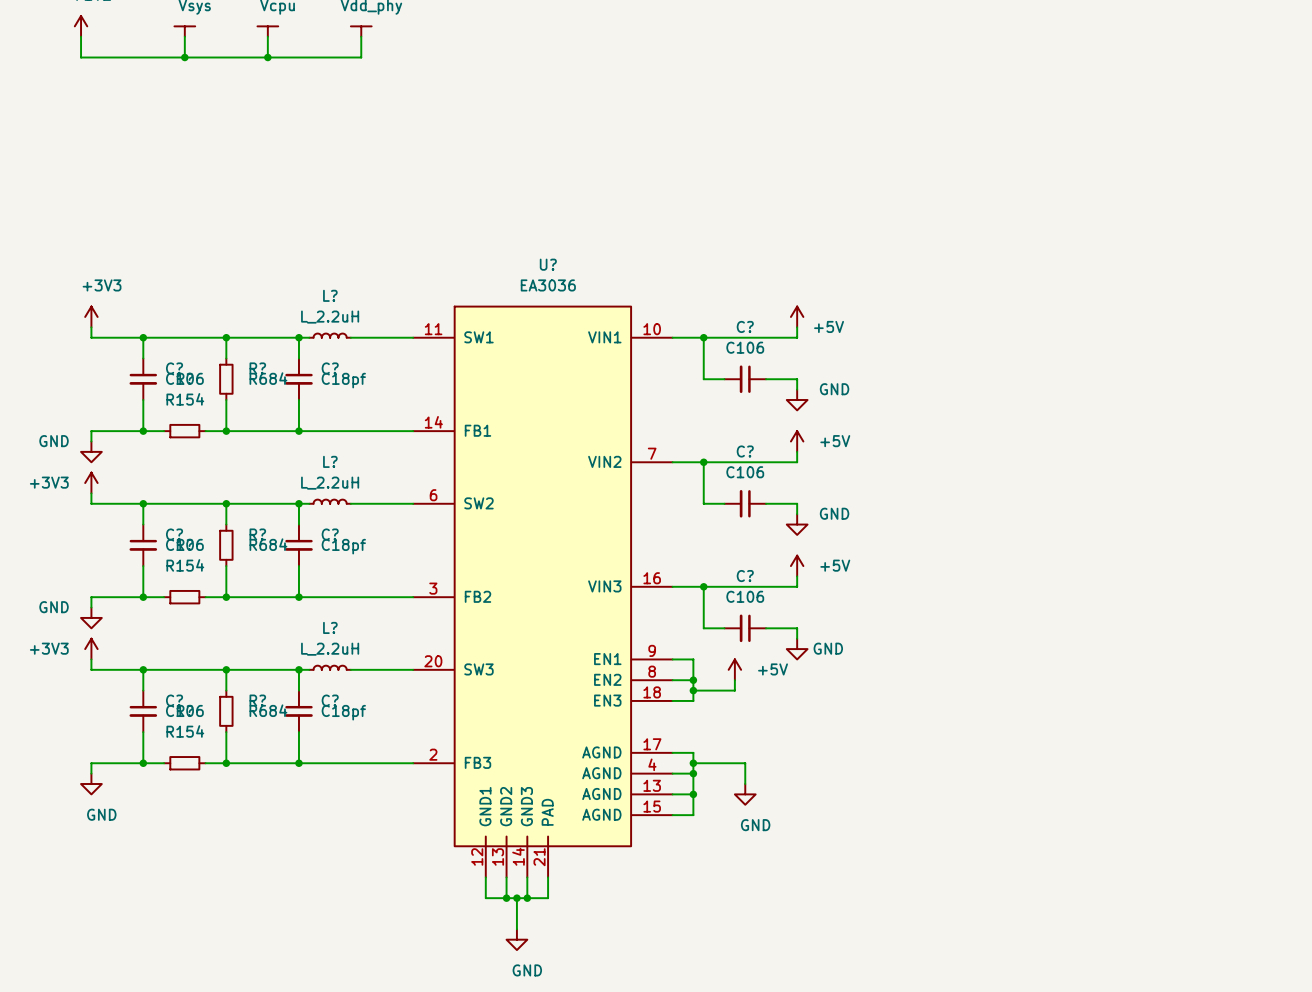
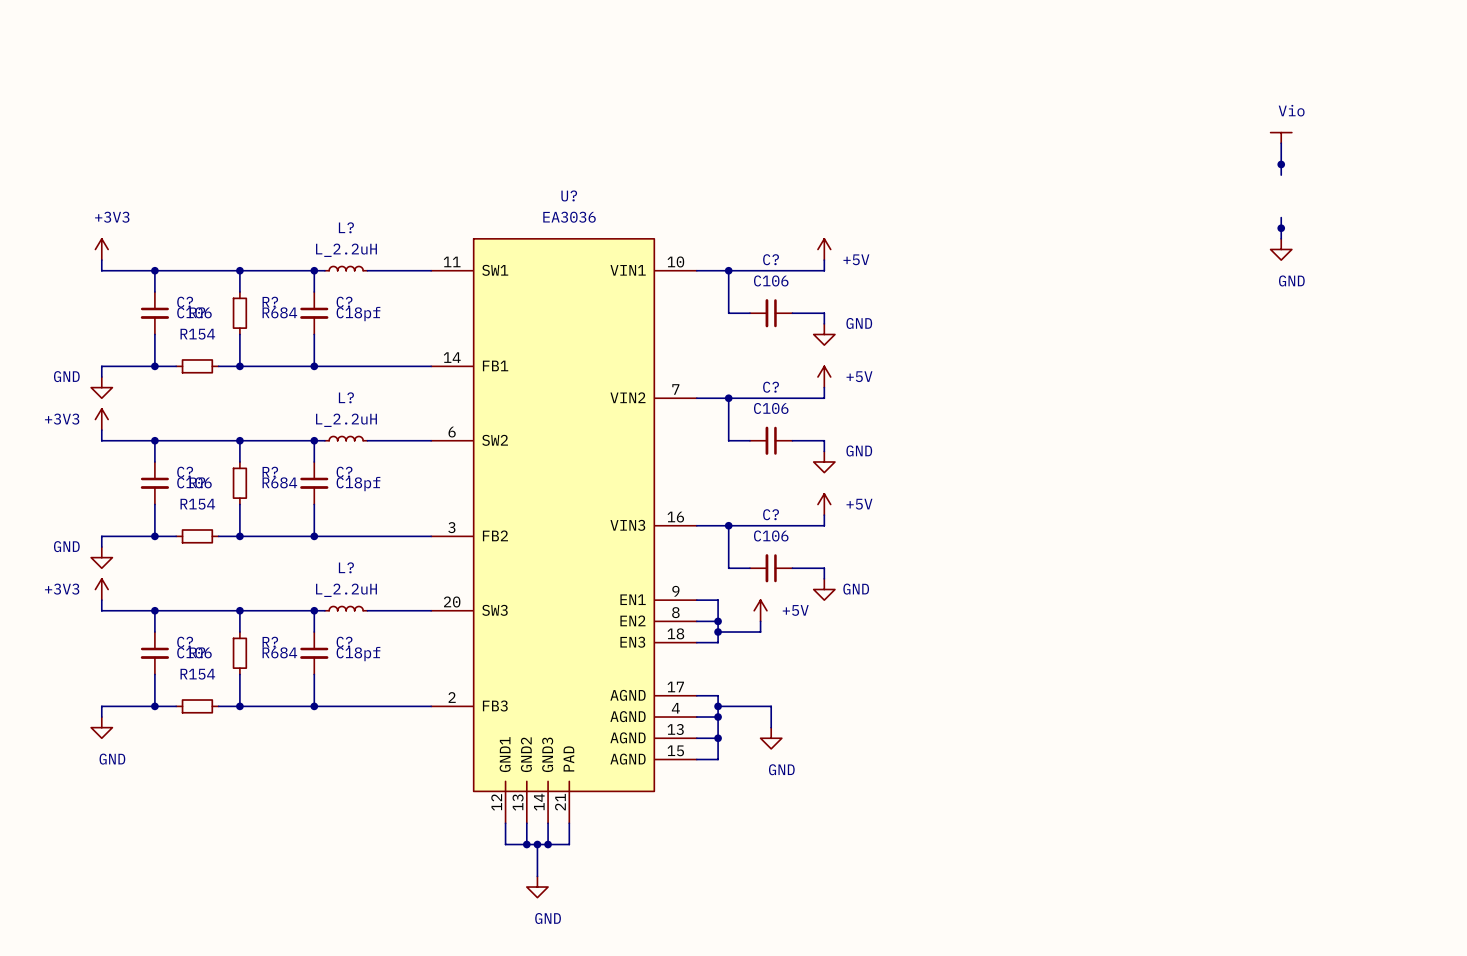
power symbol: none -> Vio (1281, 137)
wire: none -> (1281, 143) (1281, 175)
junction: none -> (1281, 164)
wire: none -> (1281, 217) (1281, 238)
junction: none -> (1281, 228)
power symbol: none -> GND (1281, 249)

